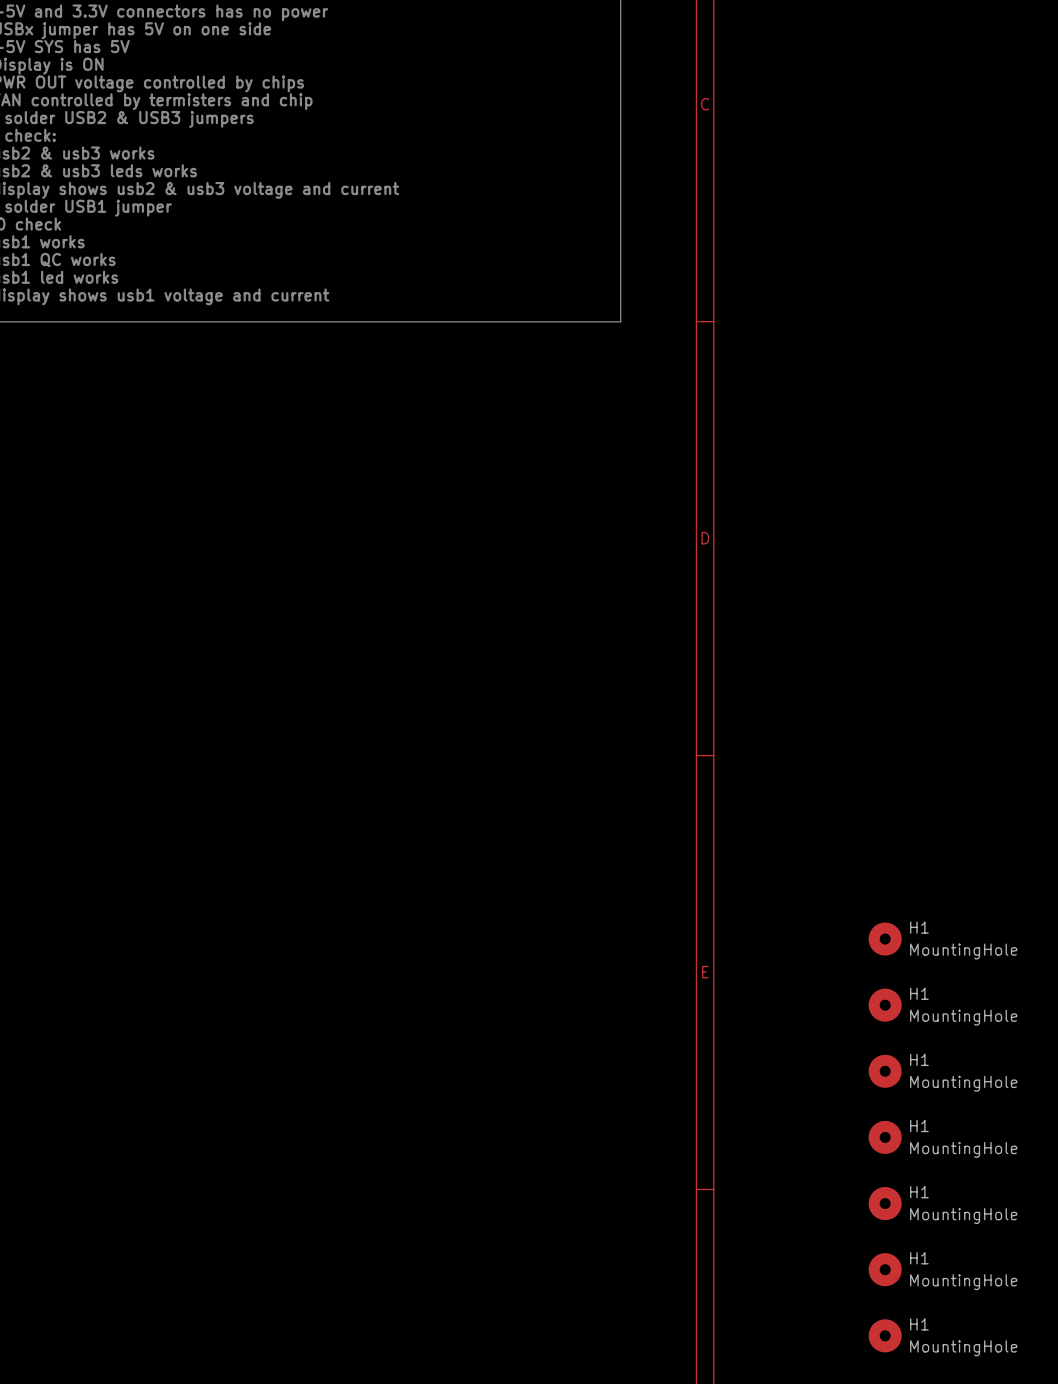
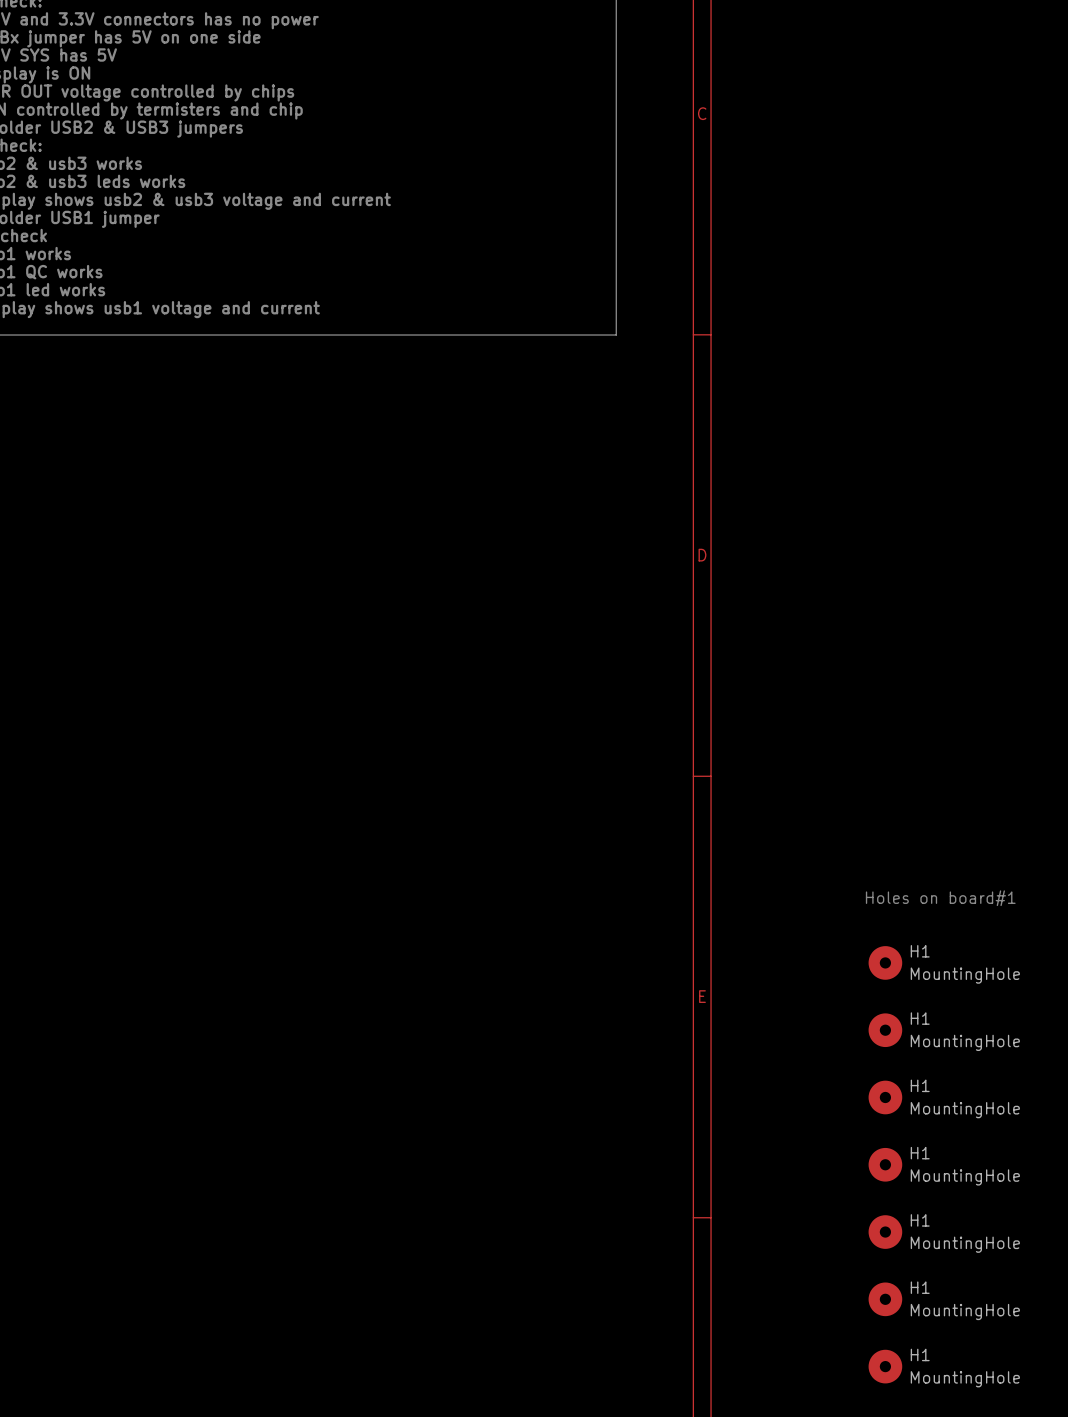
text: none -> Holes on board#1 (940, 898)

